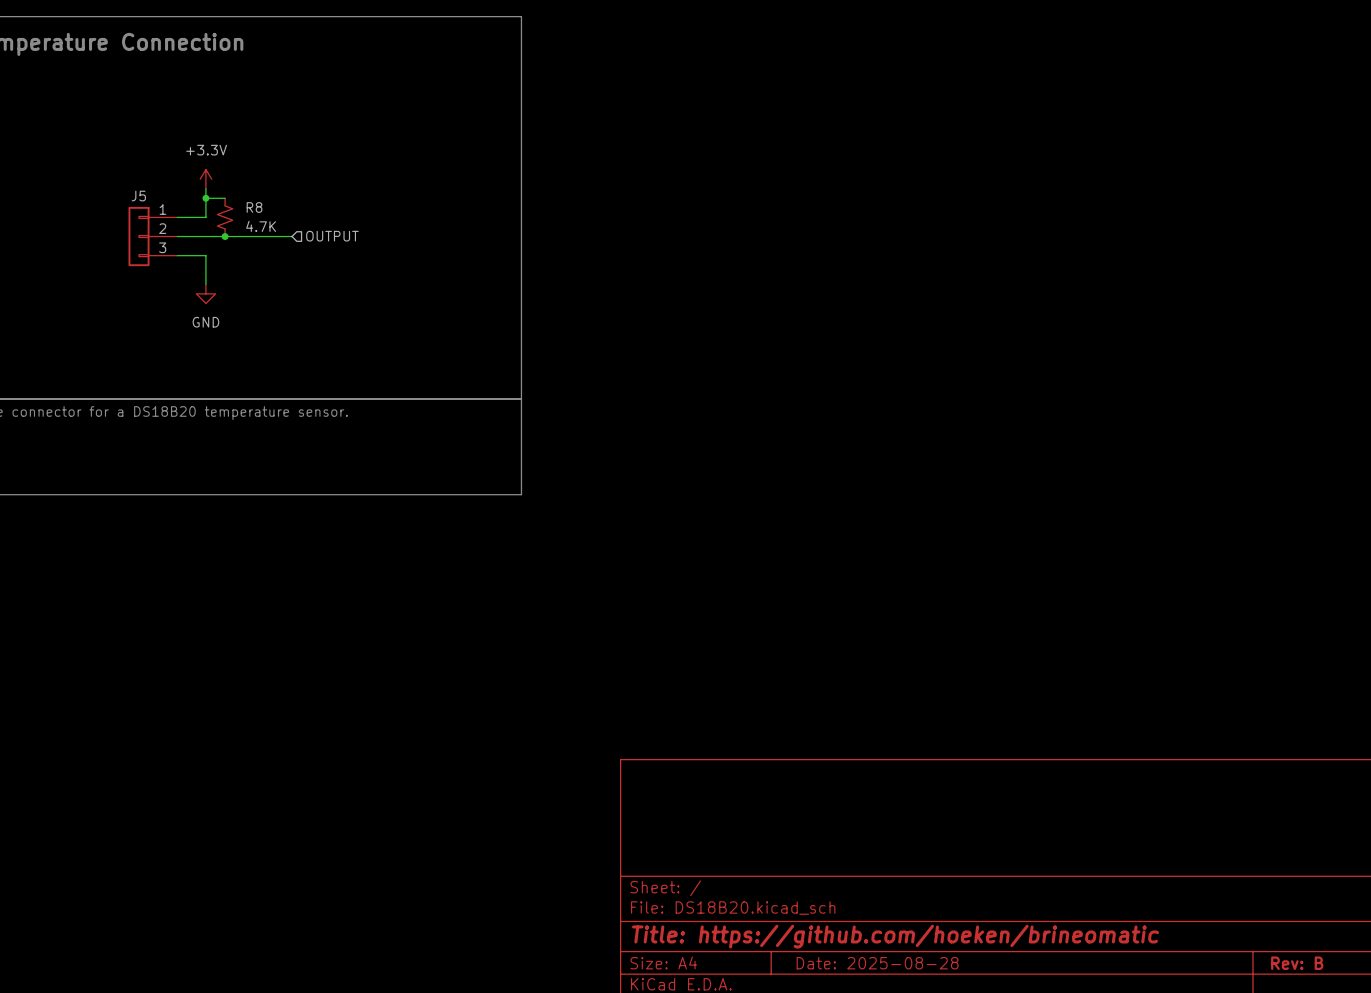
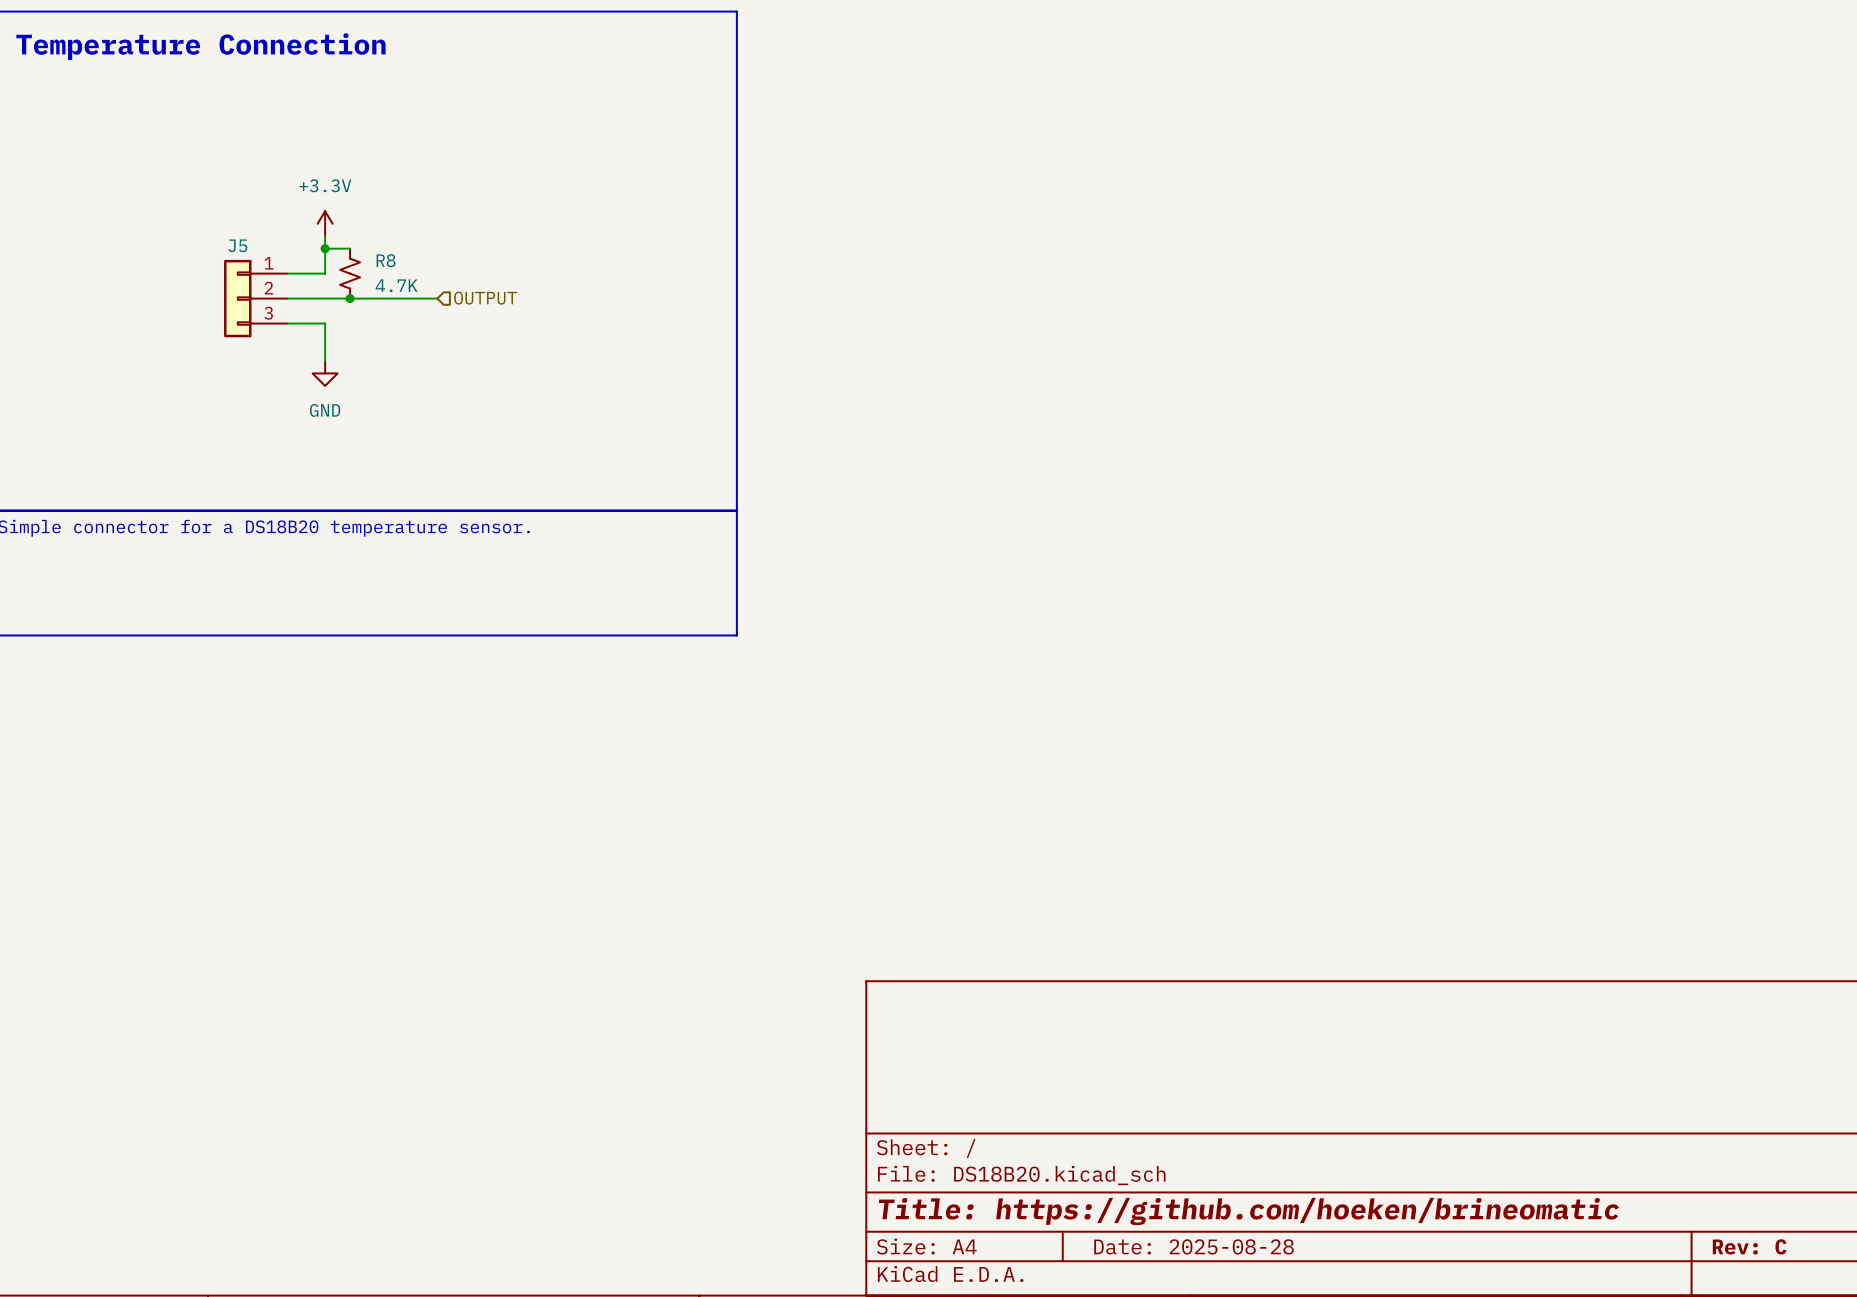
title block: Rev: B (1297, 963) -> Rev: C (1749, 1246)

